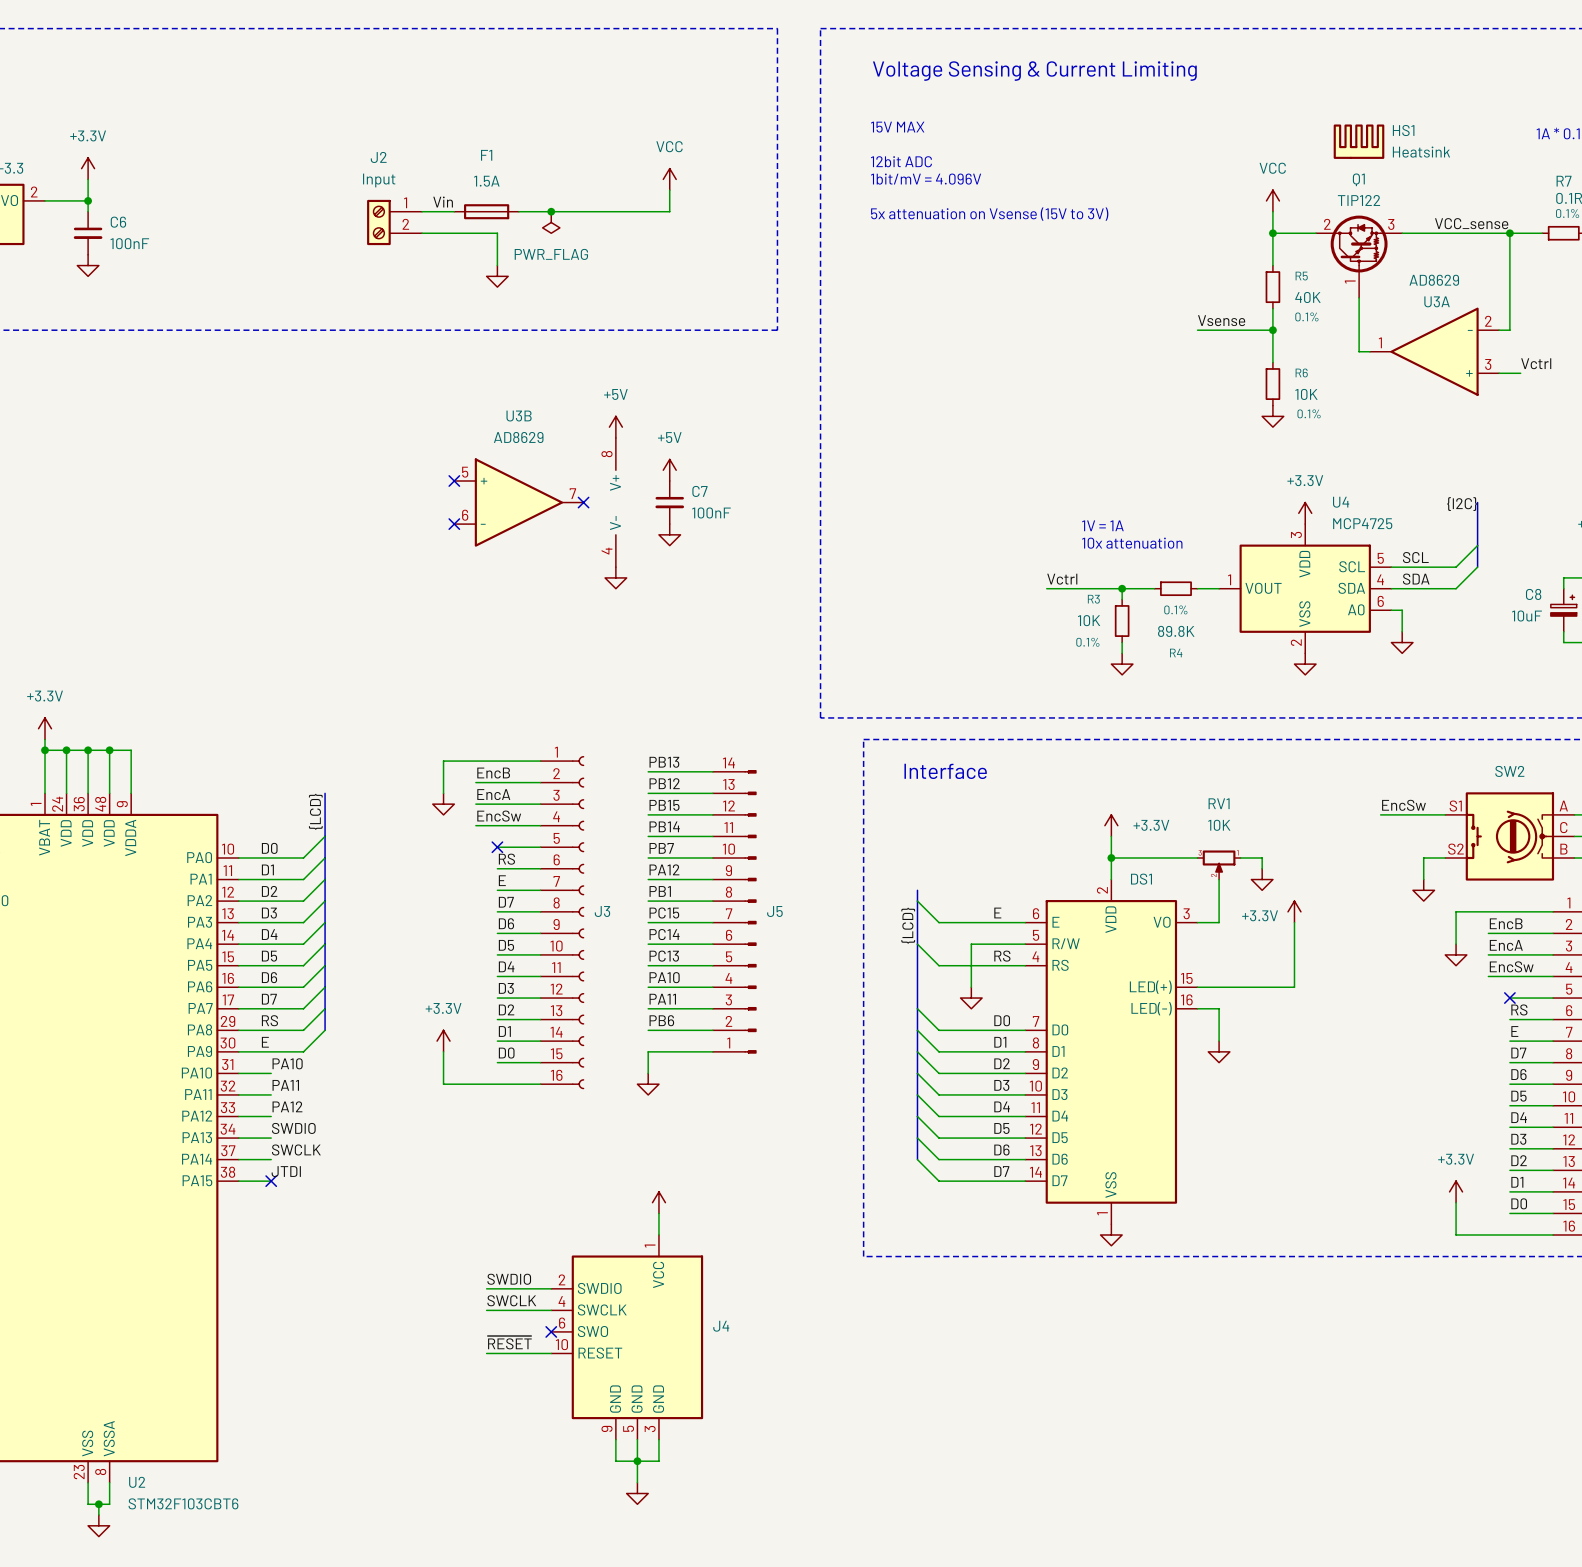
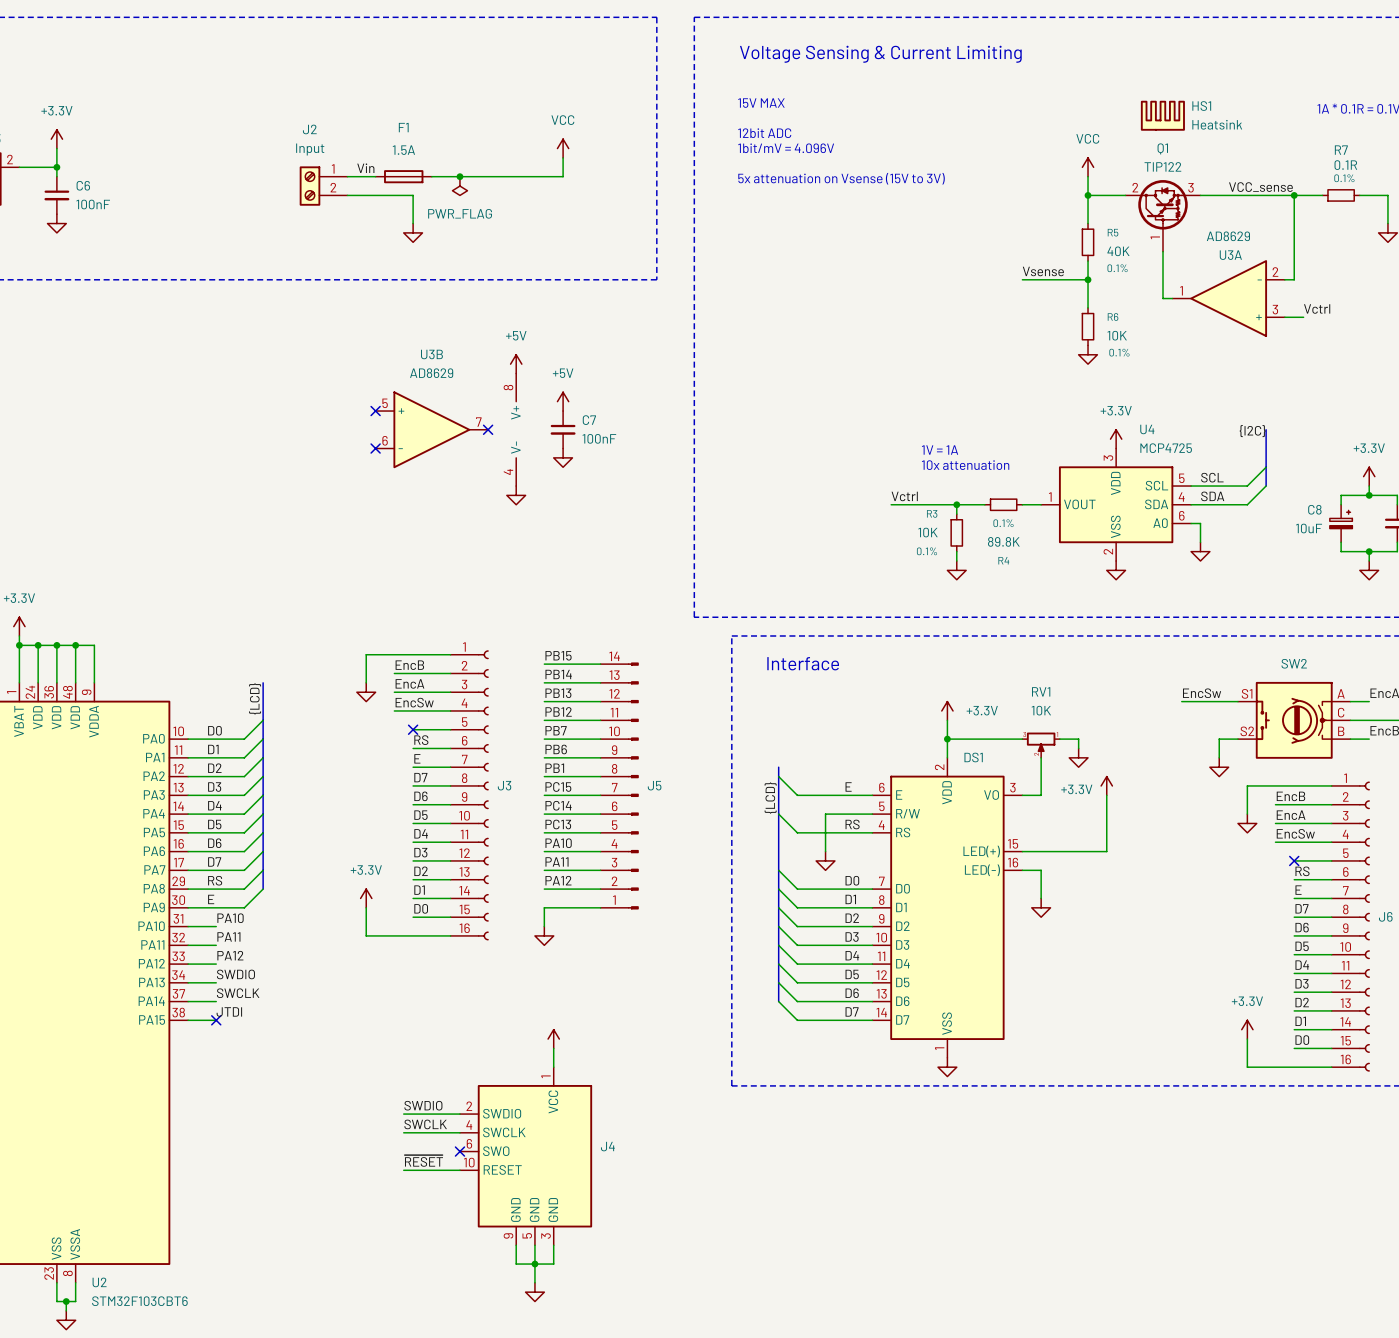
label: PB13 (664, 762) -> PB15 (558, 655)
label: PB12 (664, 783) -> PB14 (558, 674)
label: PB15 (664, 805) -> PB13 (558, 693)
label: PB14 (664, 826) -> PB12 (558, 711)
label: PA12 (664, 869) -> PB6 (556, 749)
label: PB6 (661, 1020) -> PA12 (558, 880)

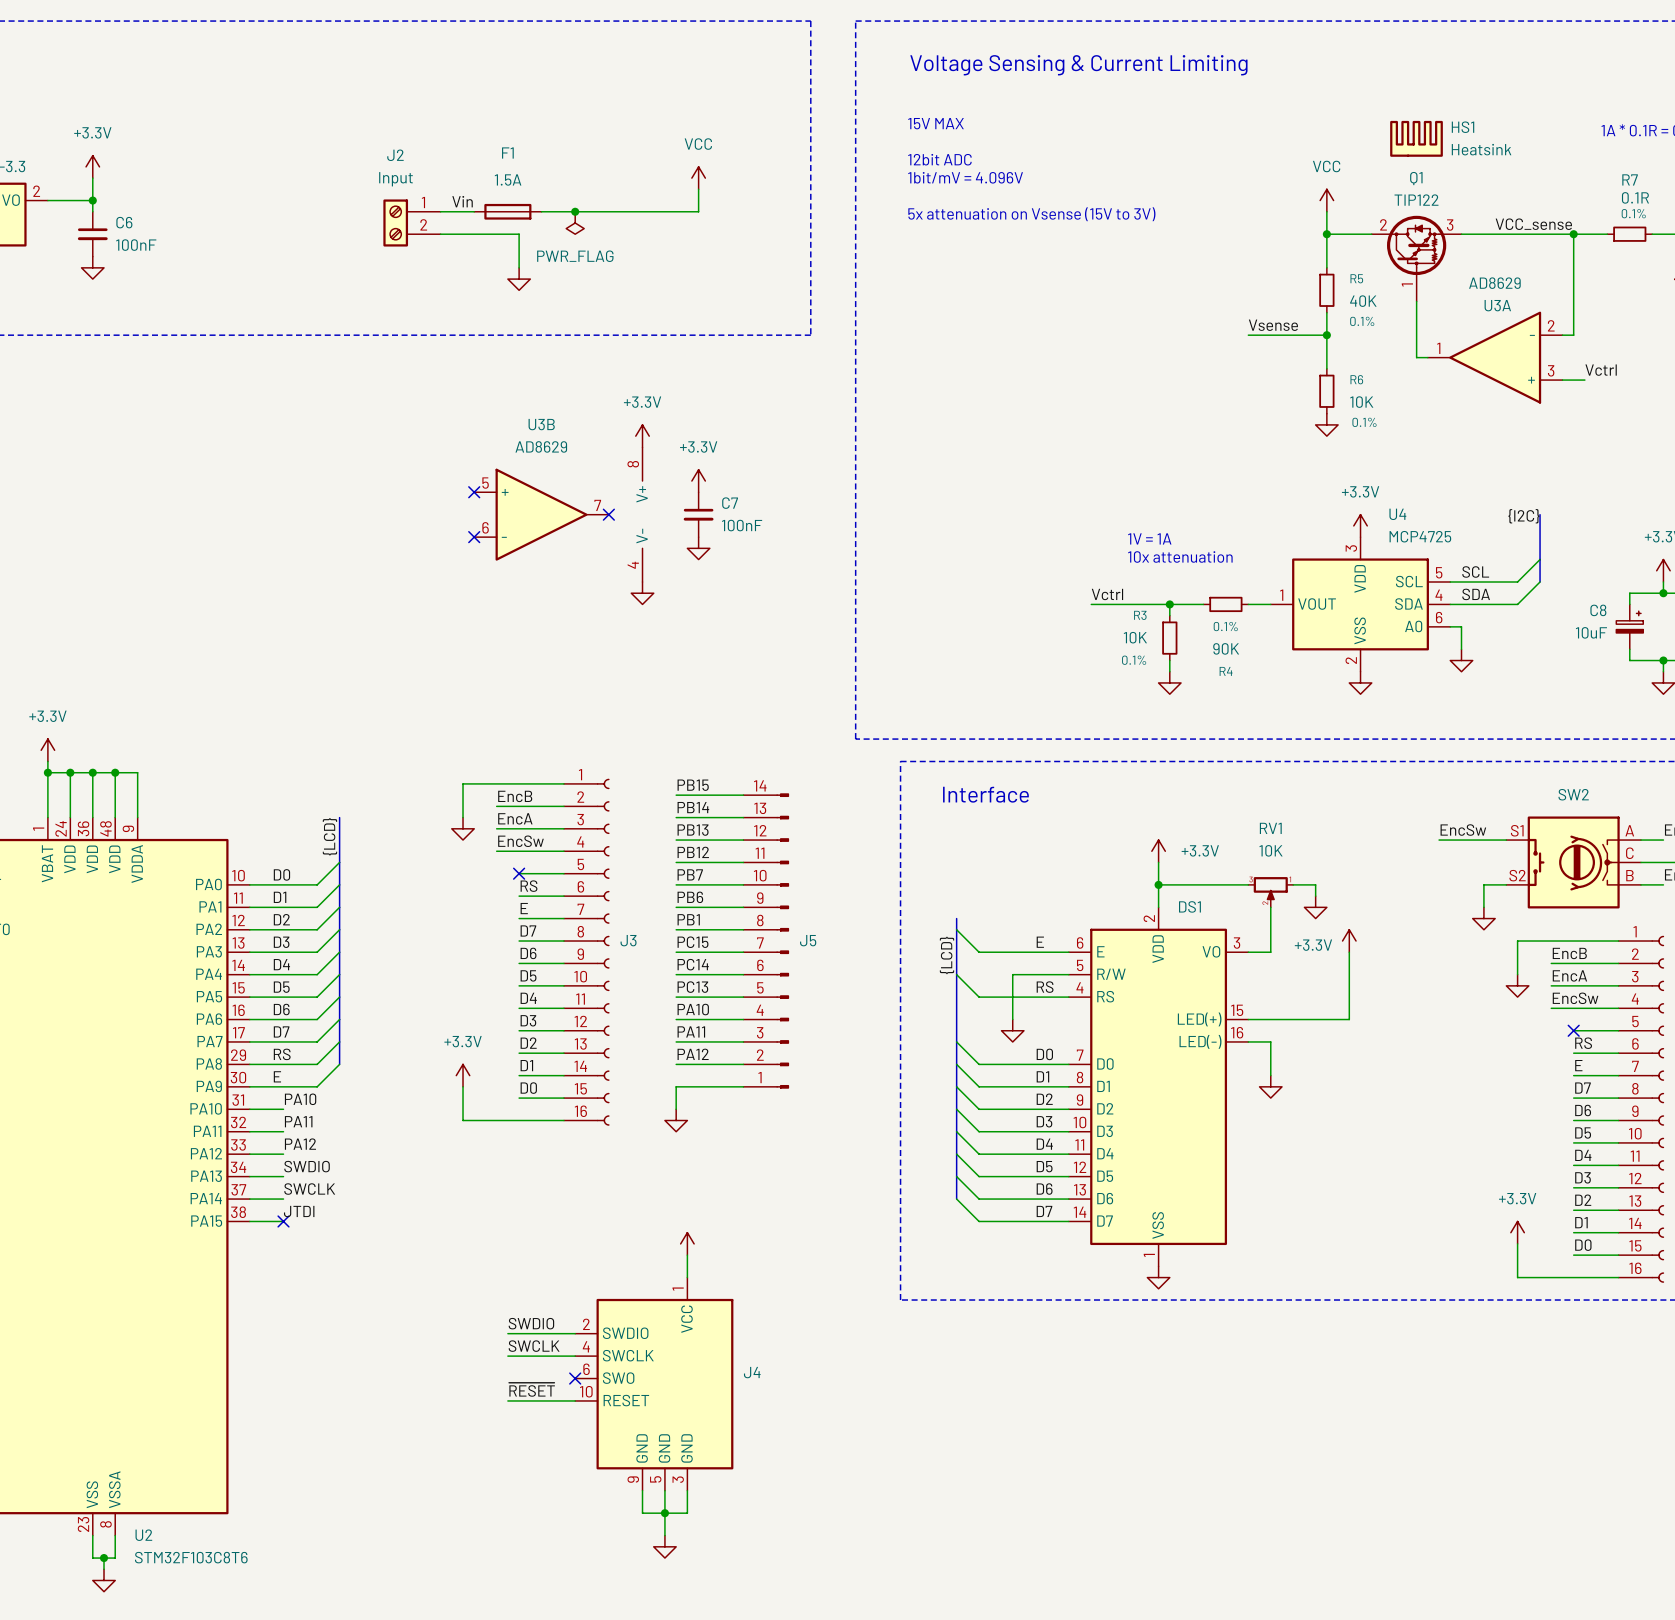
power symbol: +5V (516, 364) -> +3.3V (642, 436)
power symbol: +5V (563, 401) -> +3.3V (698, 481)
R4 value: 89.8K (1003, 541) -> 90K (1226, 648)
U2 value: STM32F103CBT6 (139, 1301) -> STM32F103C8T6 (191, 1557)

